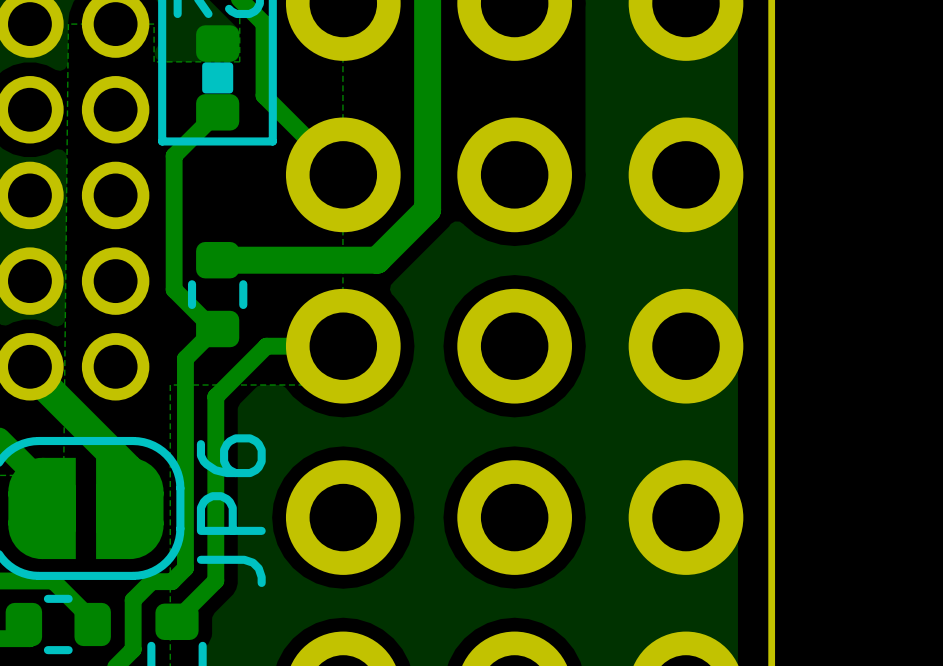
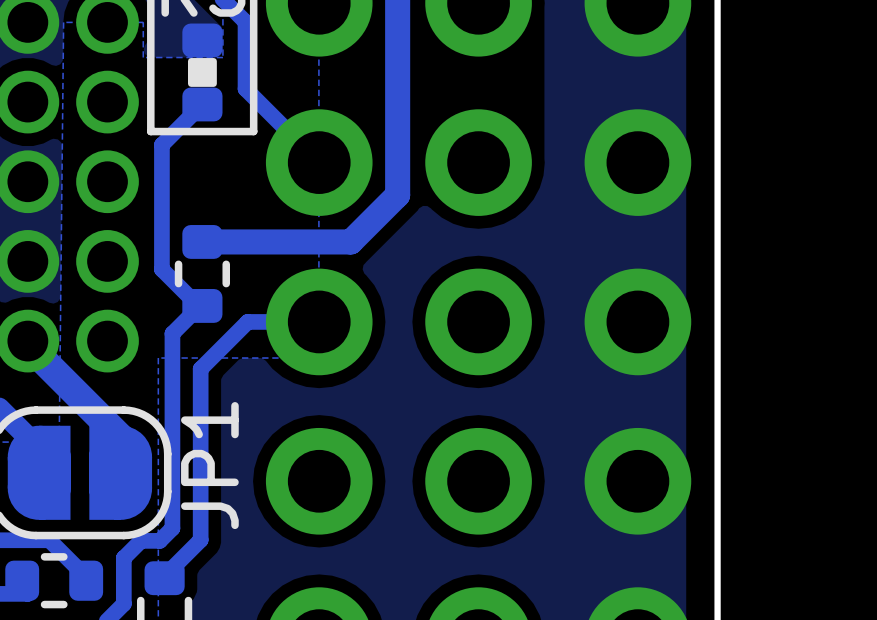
text: JP6 (231, 510) -> JP1 (209, 465)

